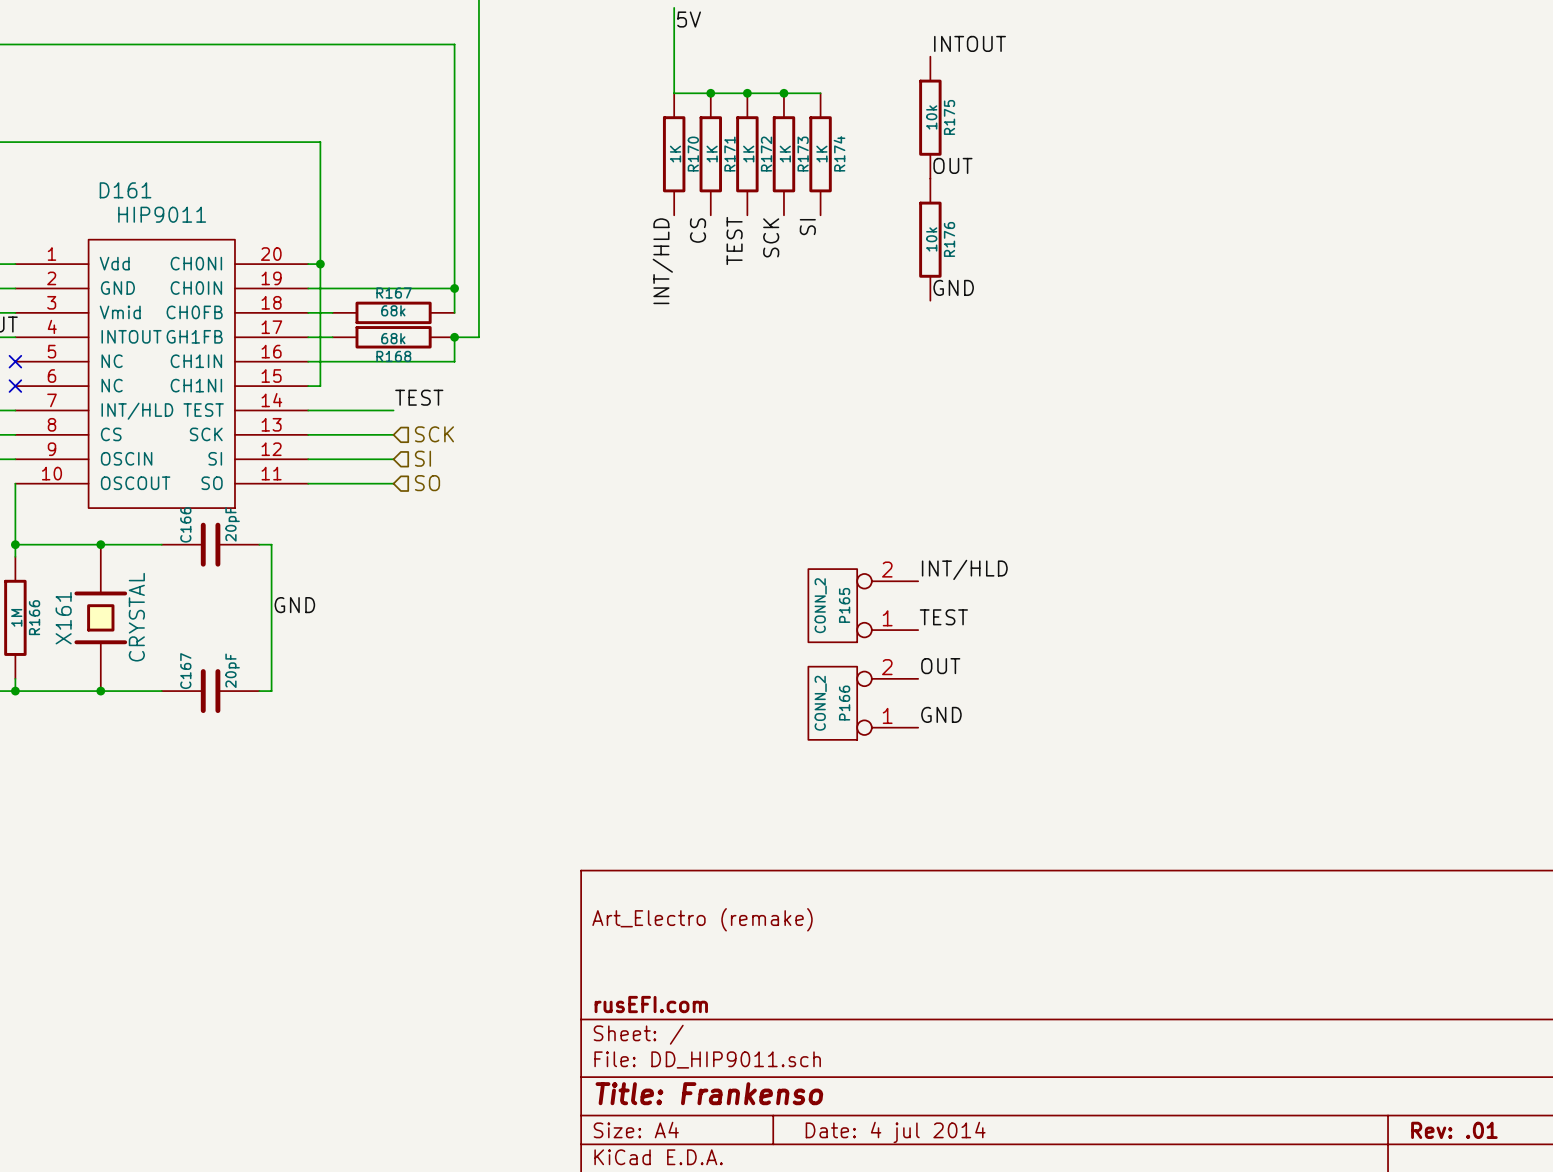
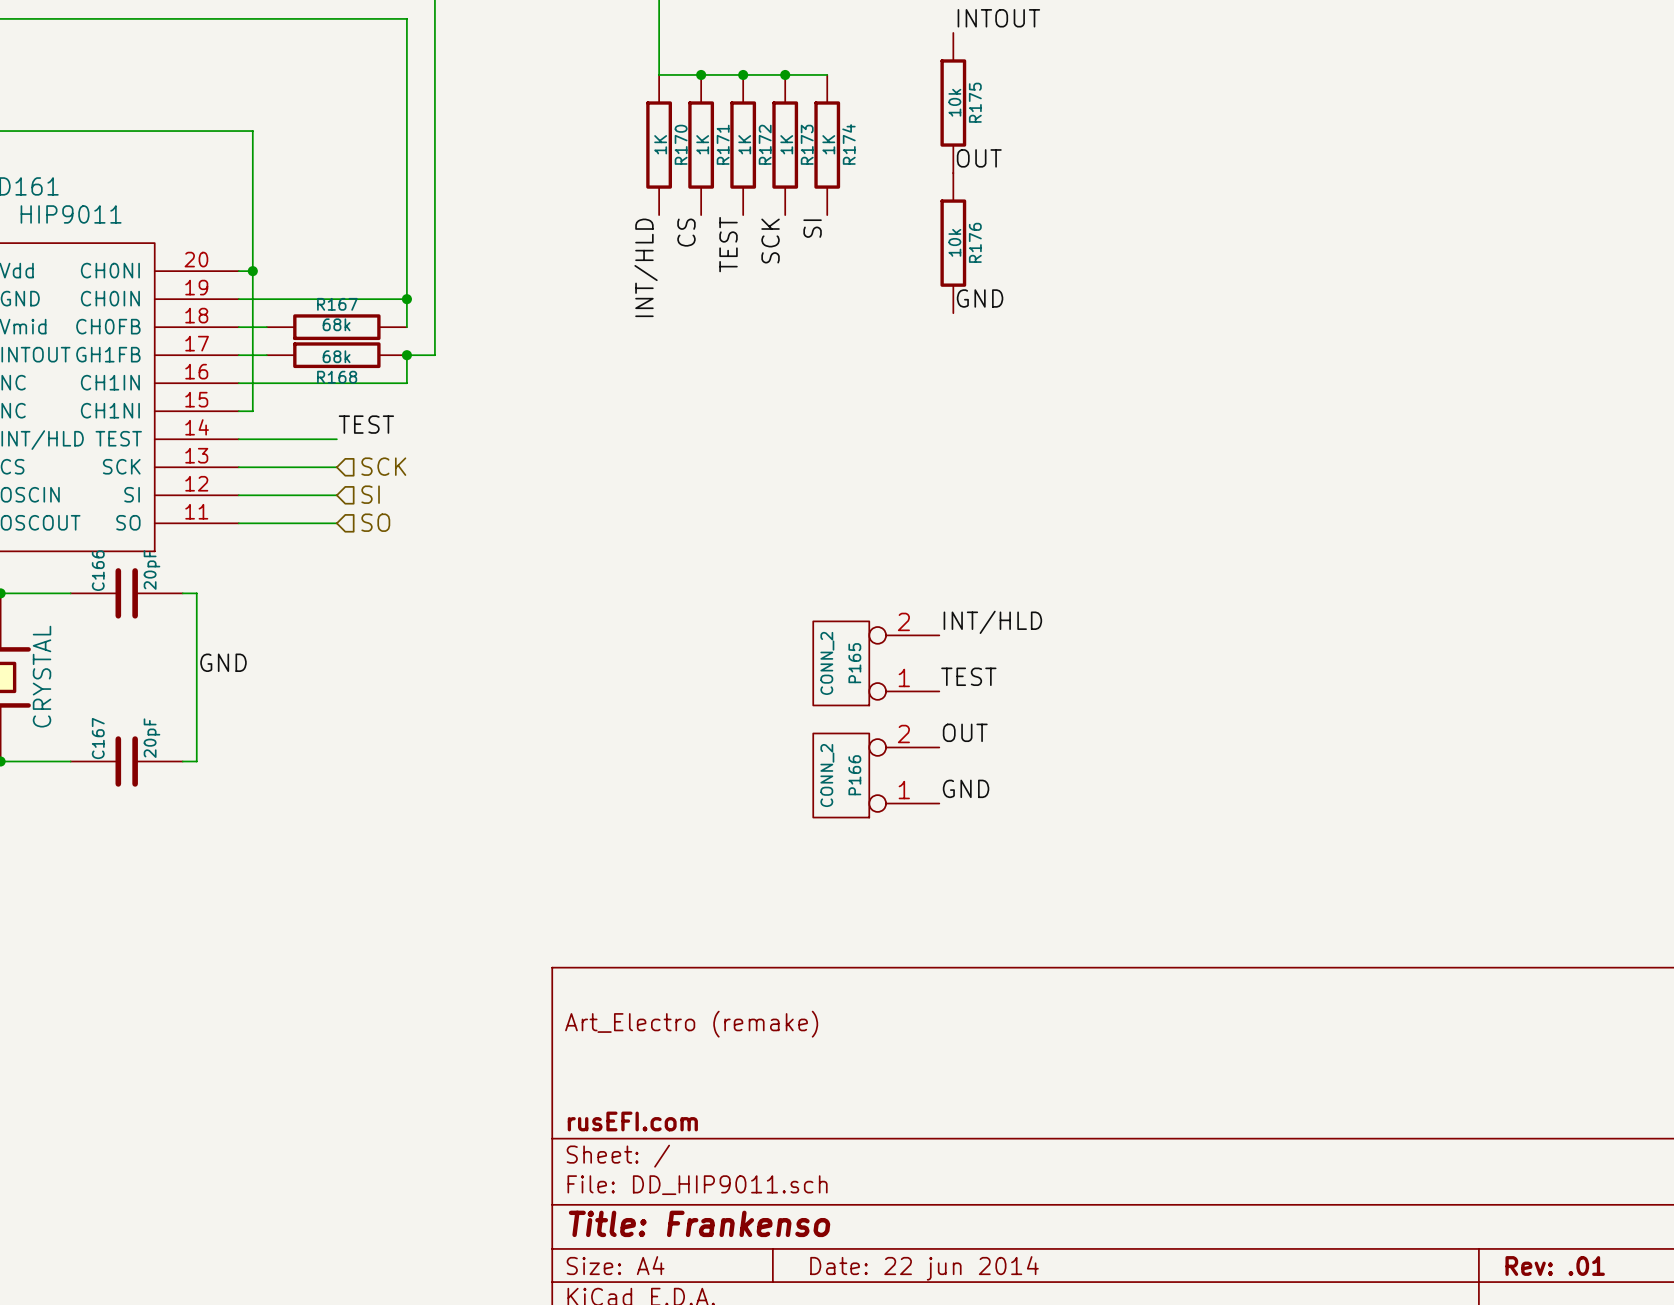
title block: Date: 4 jul 2014 (895, 1132) -> Date: 22 jun 2014 (924, 1268)

